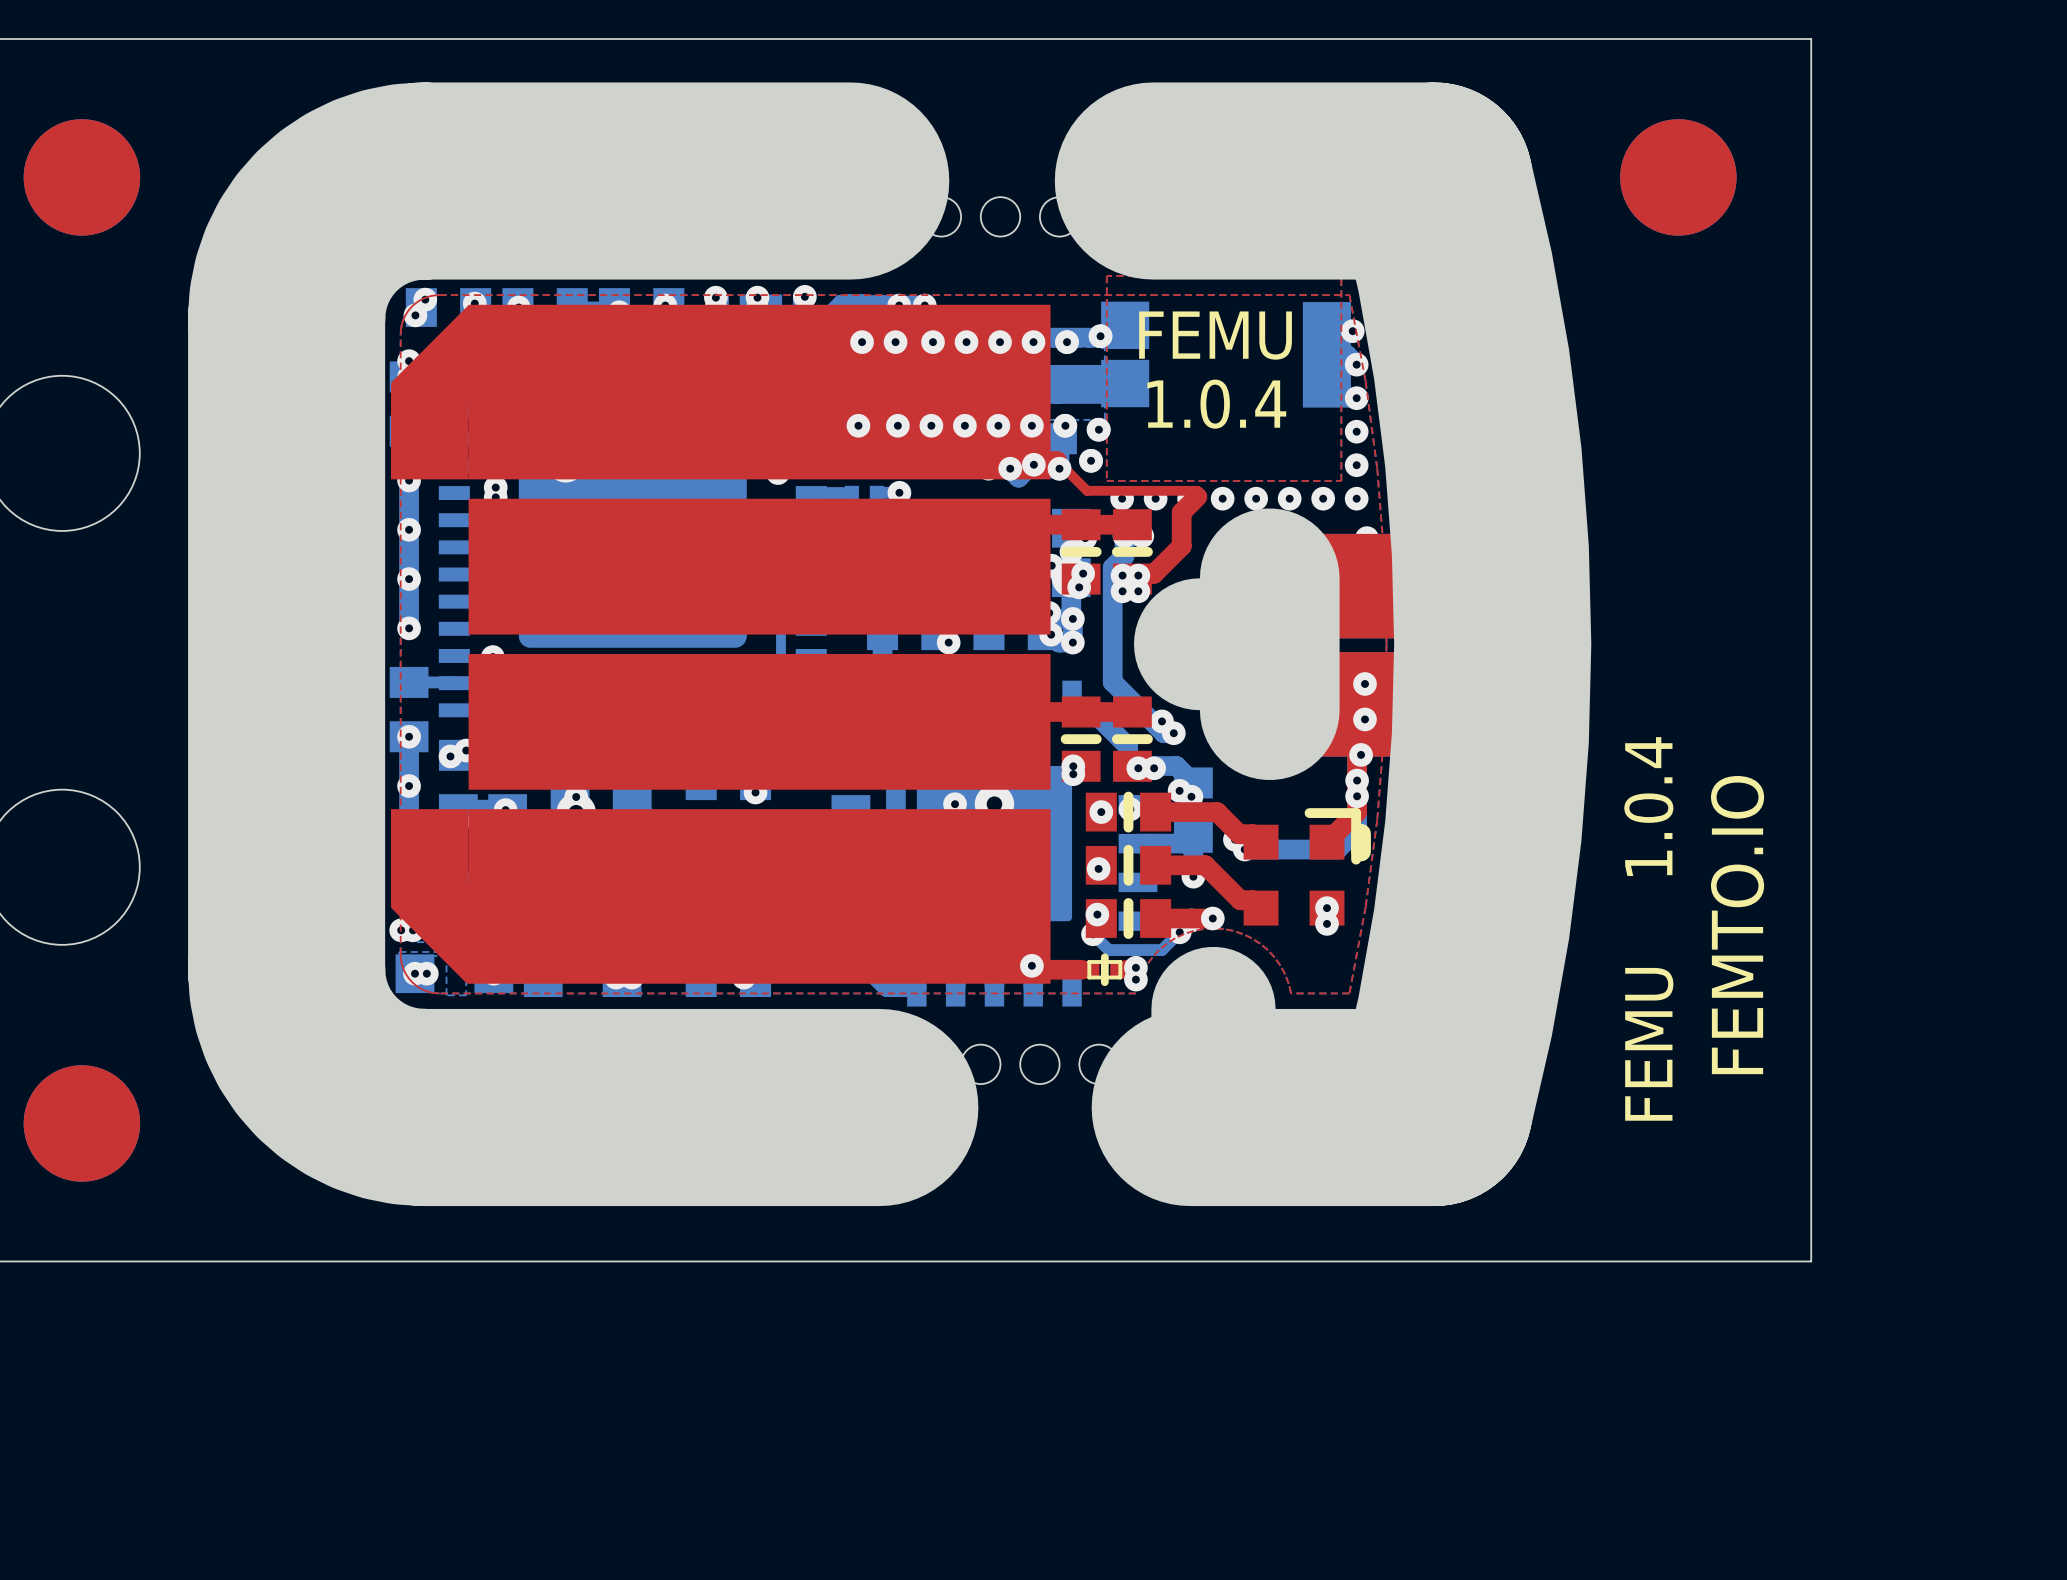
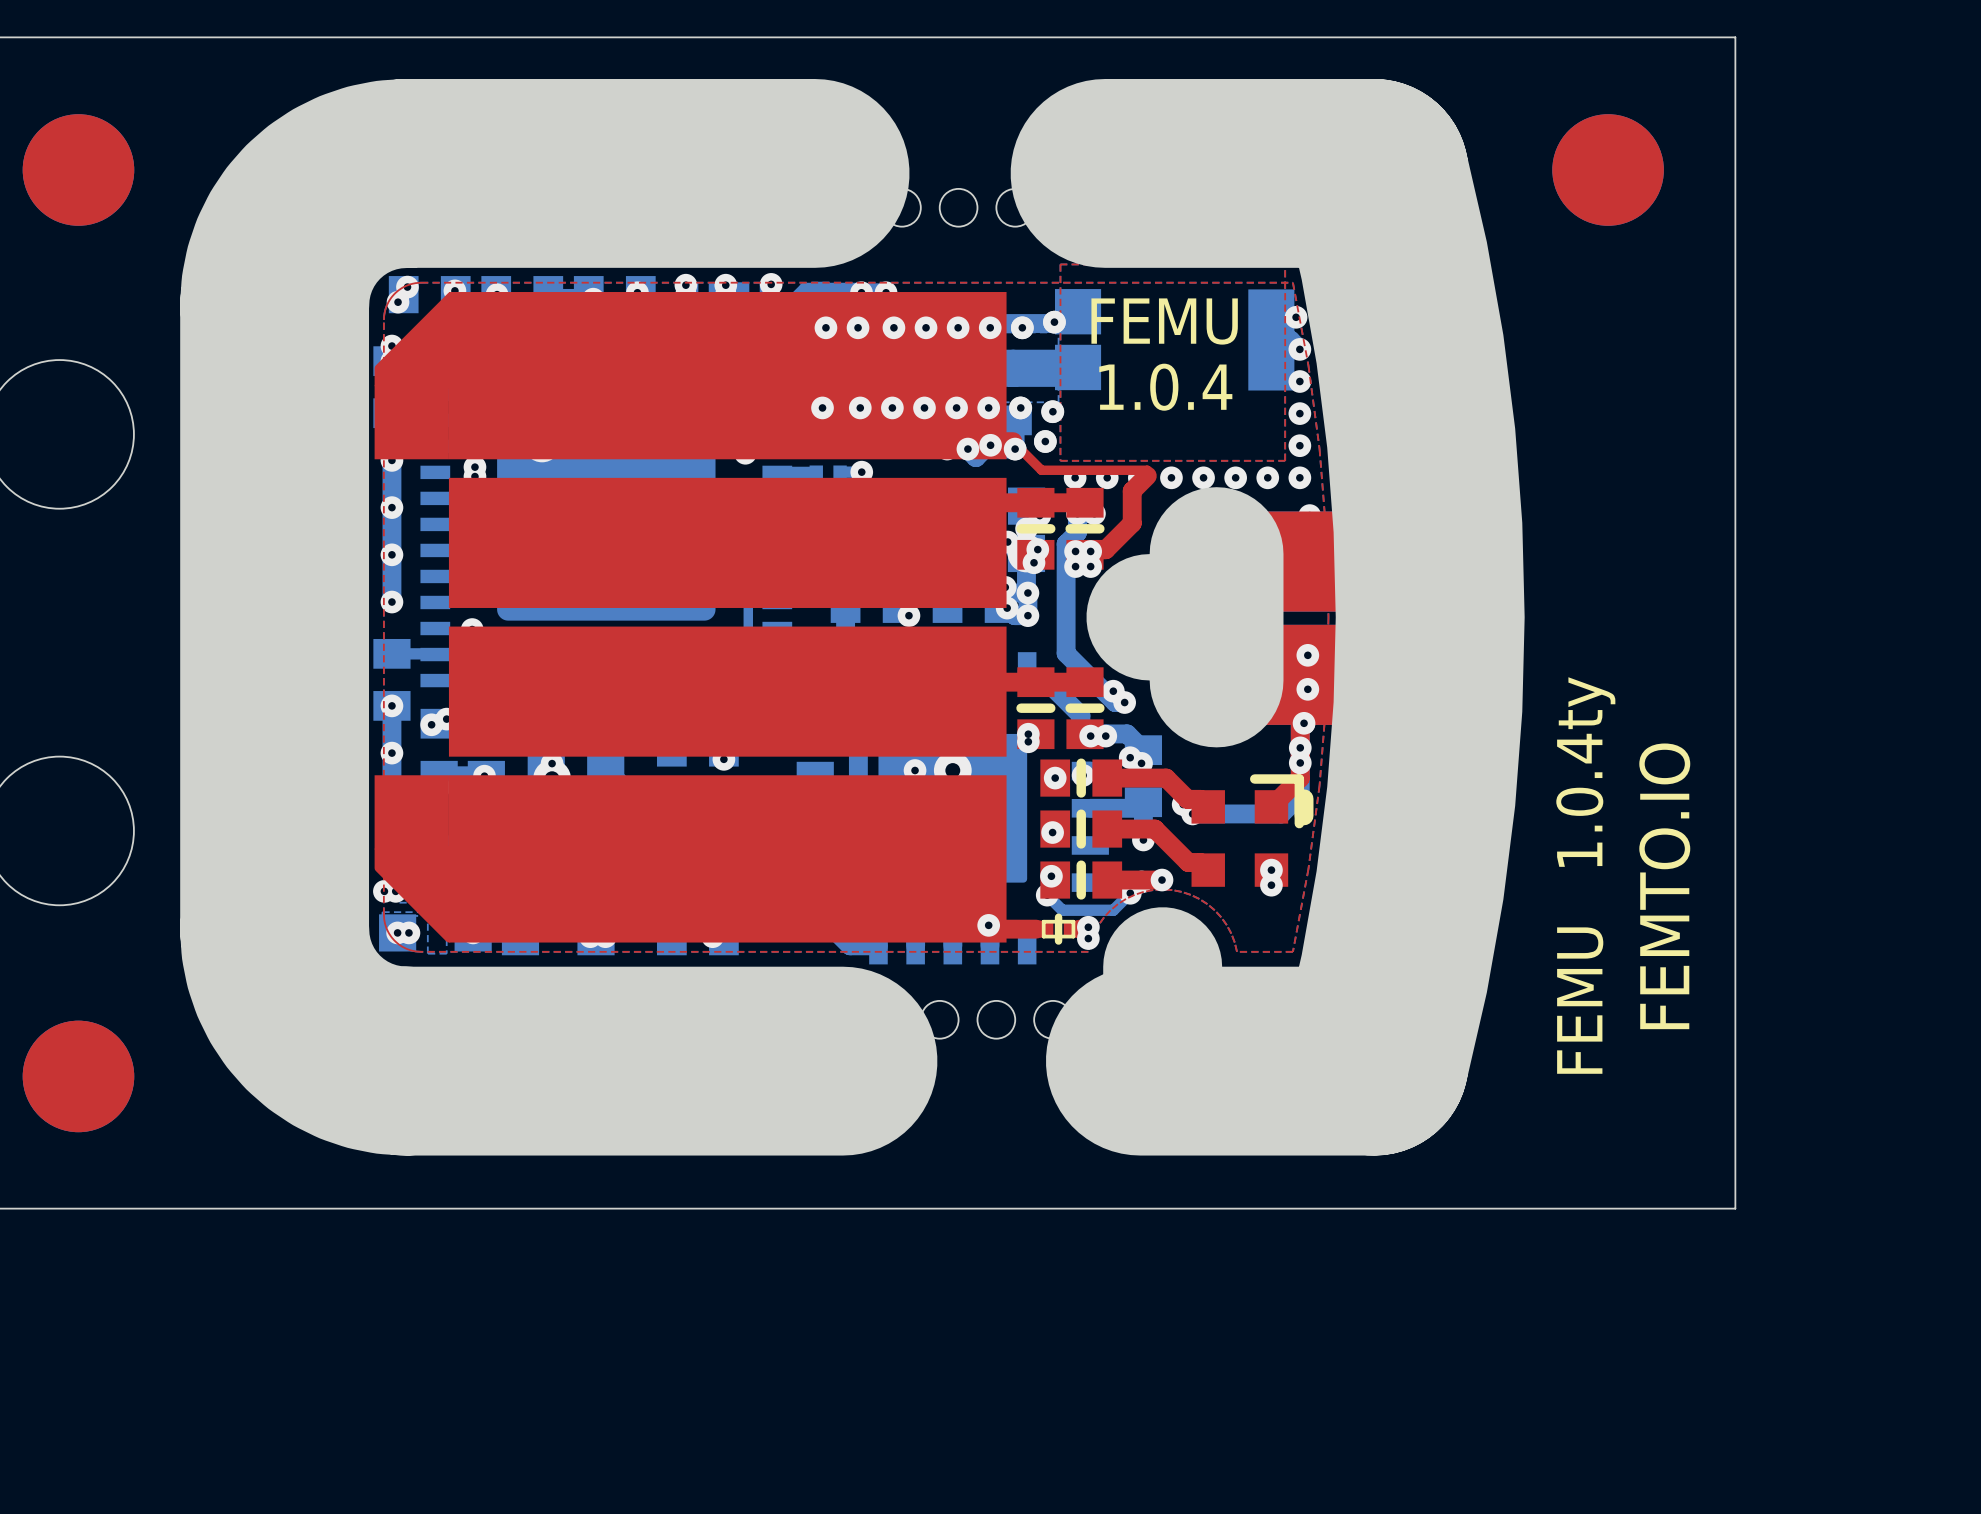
text: 1.0.4 (1648, 806) -> 1.0.4ty (1585, 772)

